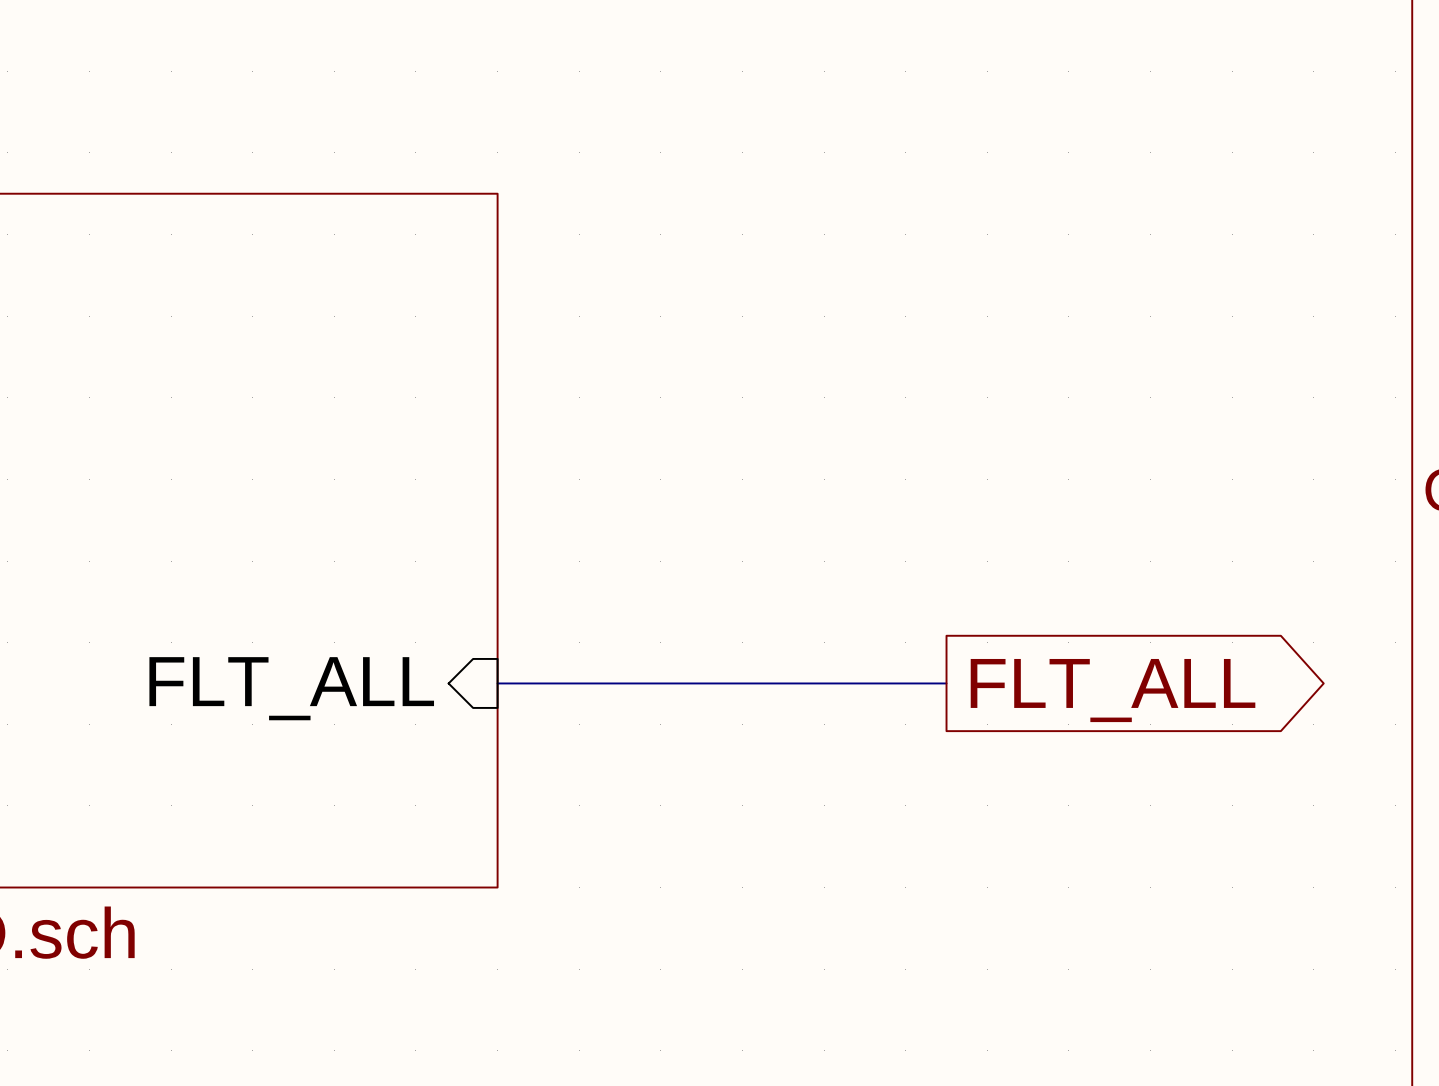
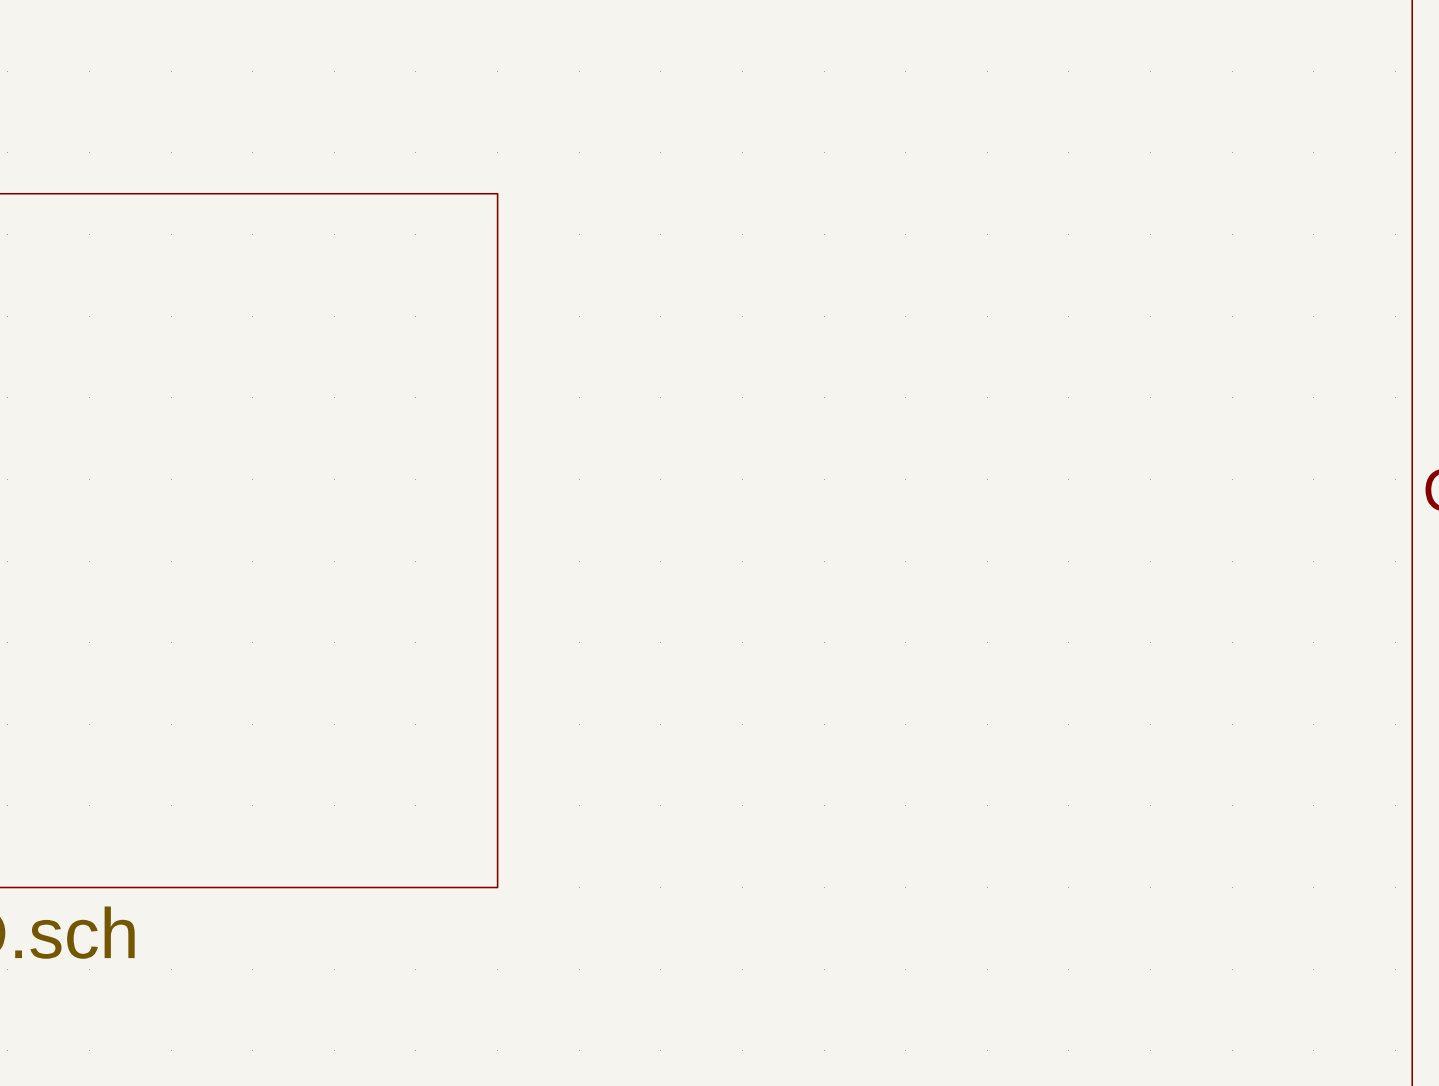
wire: (497, 683) (946, 683) -> none
sheet pin: FLT_ALL (291, 688) -> none
global label: FLT_ALL (1113, 690) -> none

